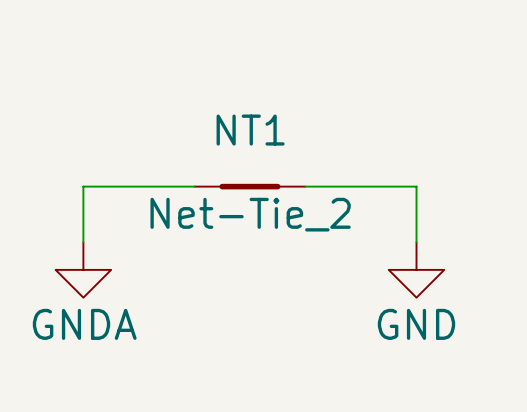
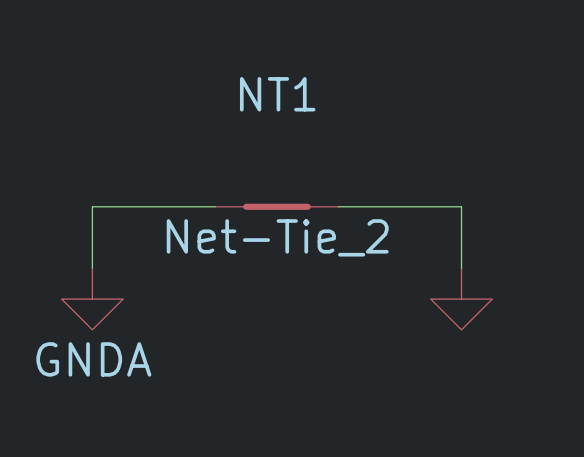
NT1 name position: NT1 (250, 130) -> NT1 (277, 94)
power symbol text: GND (416, 324) -> none

